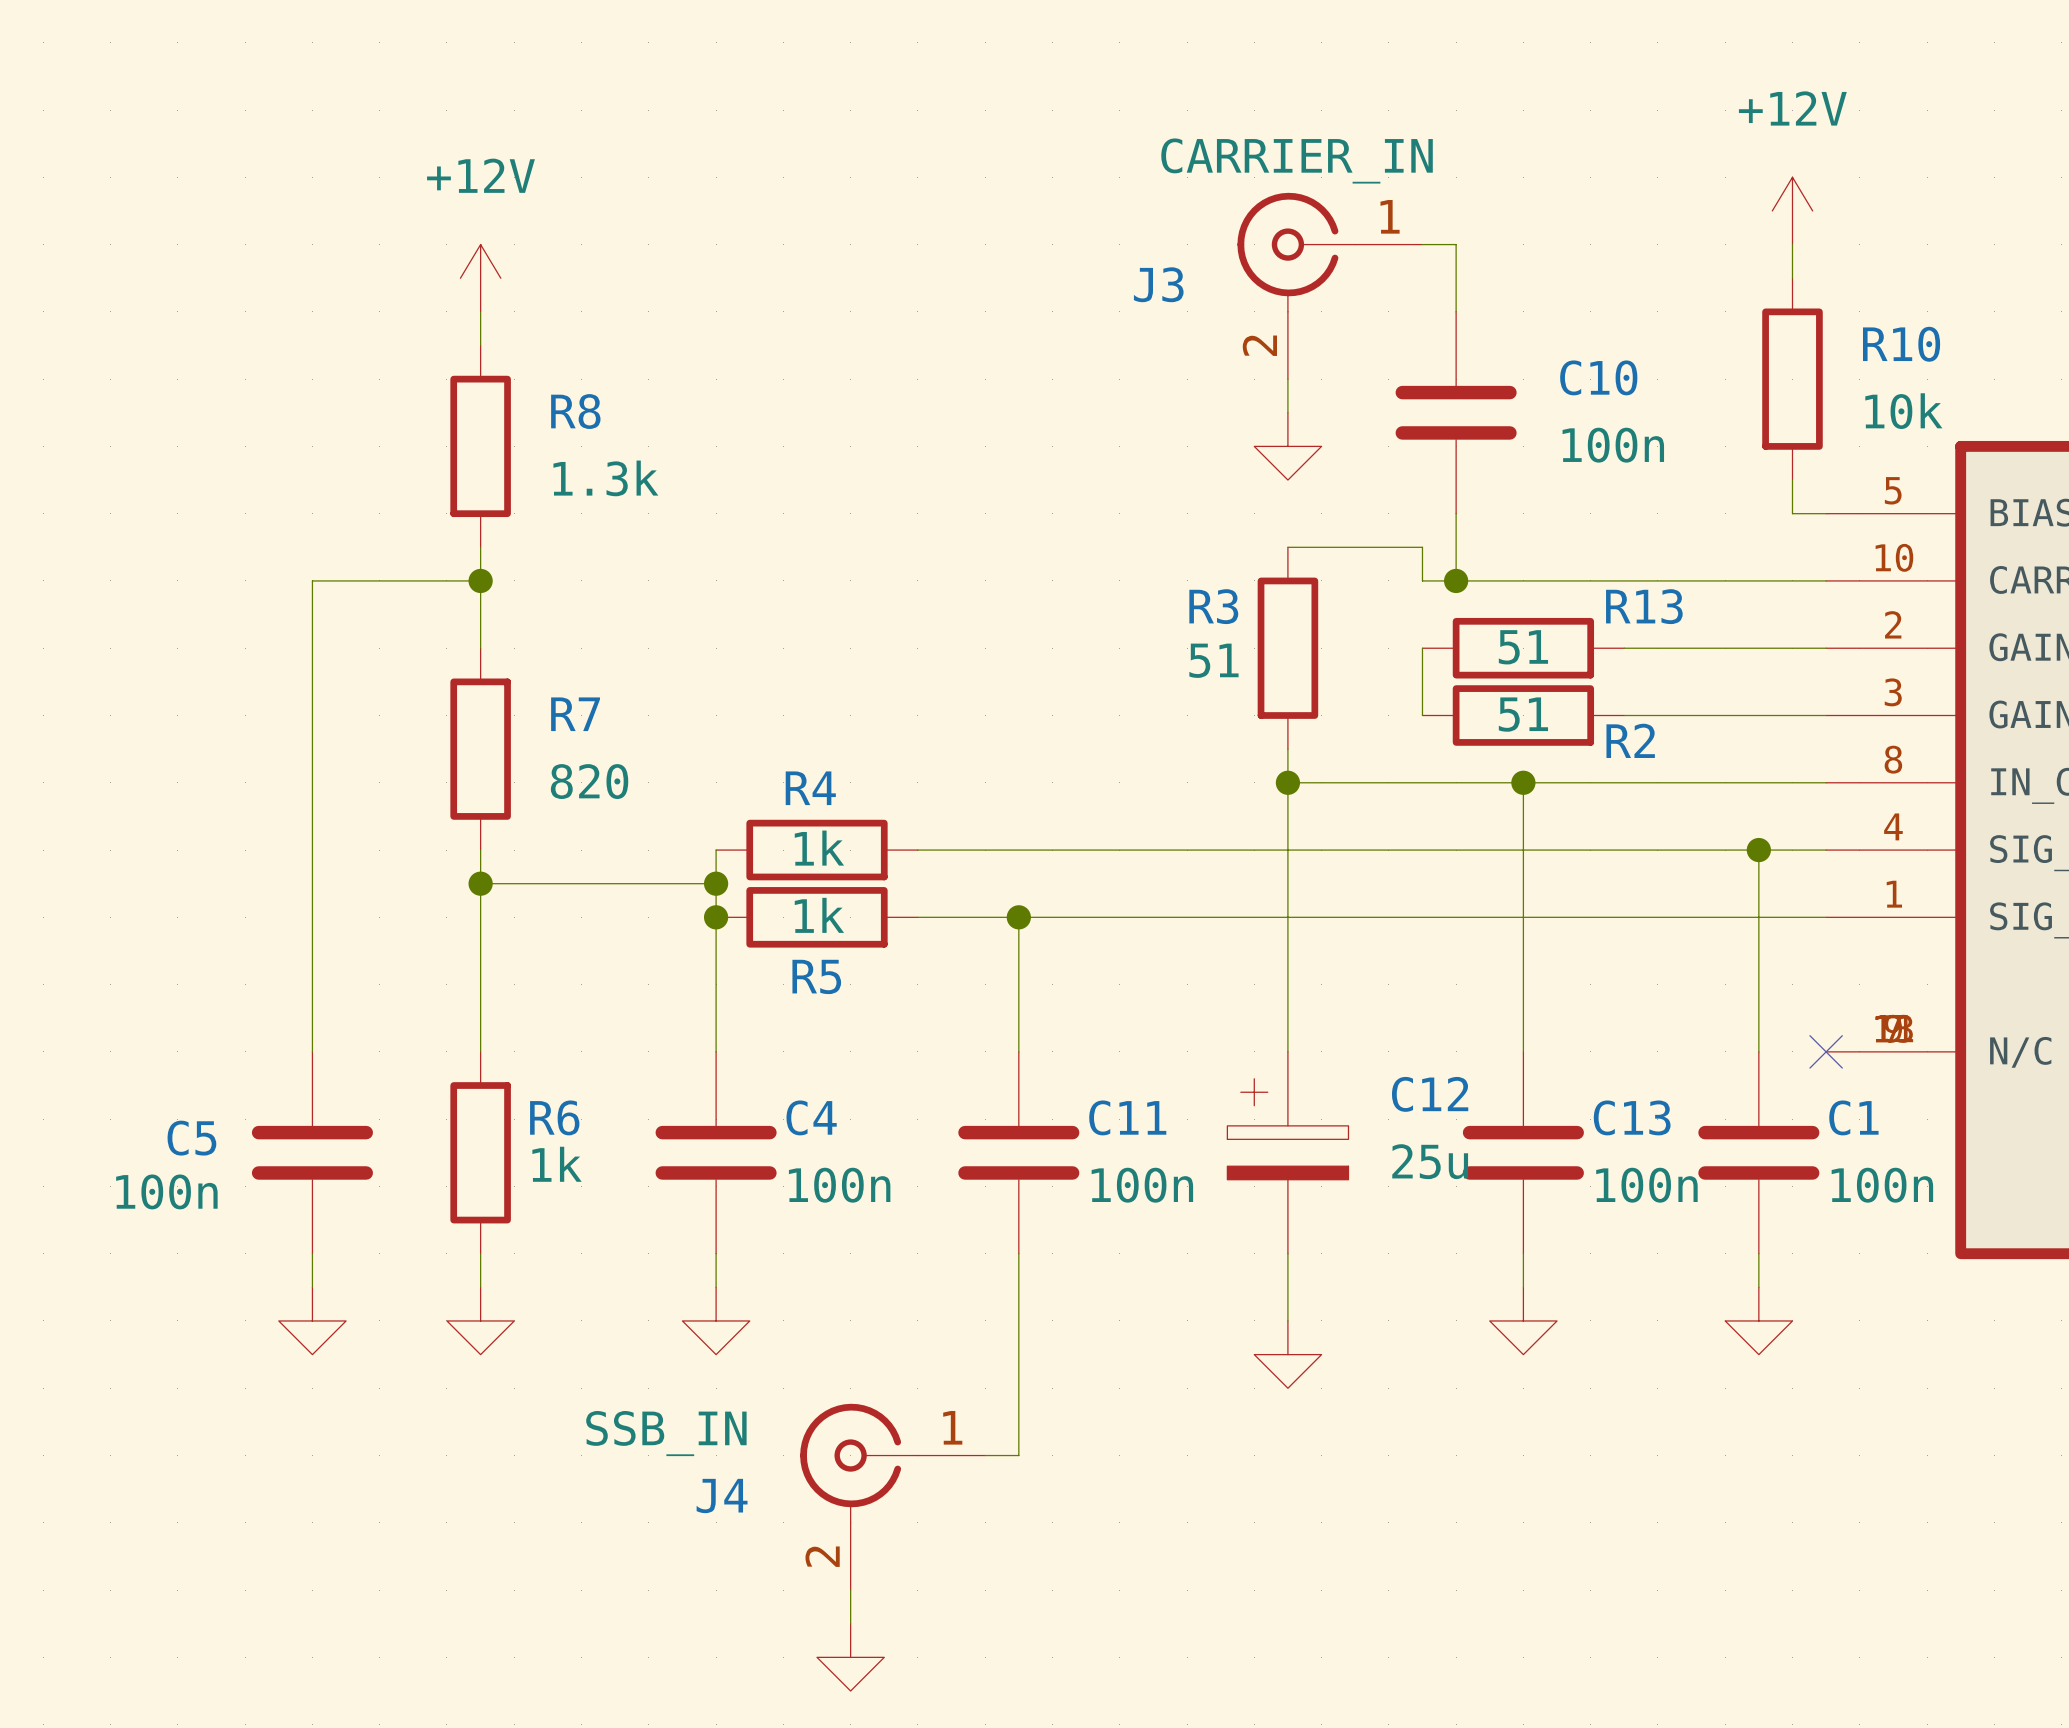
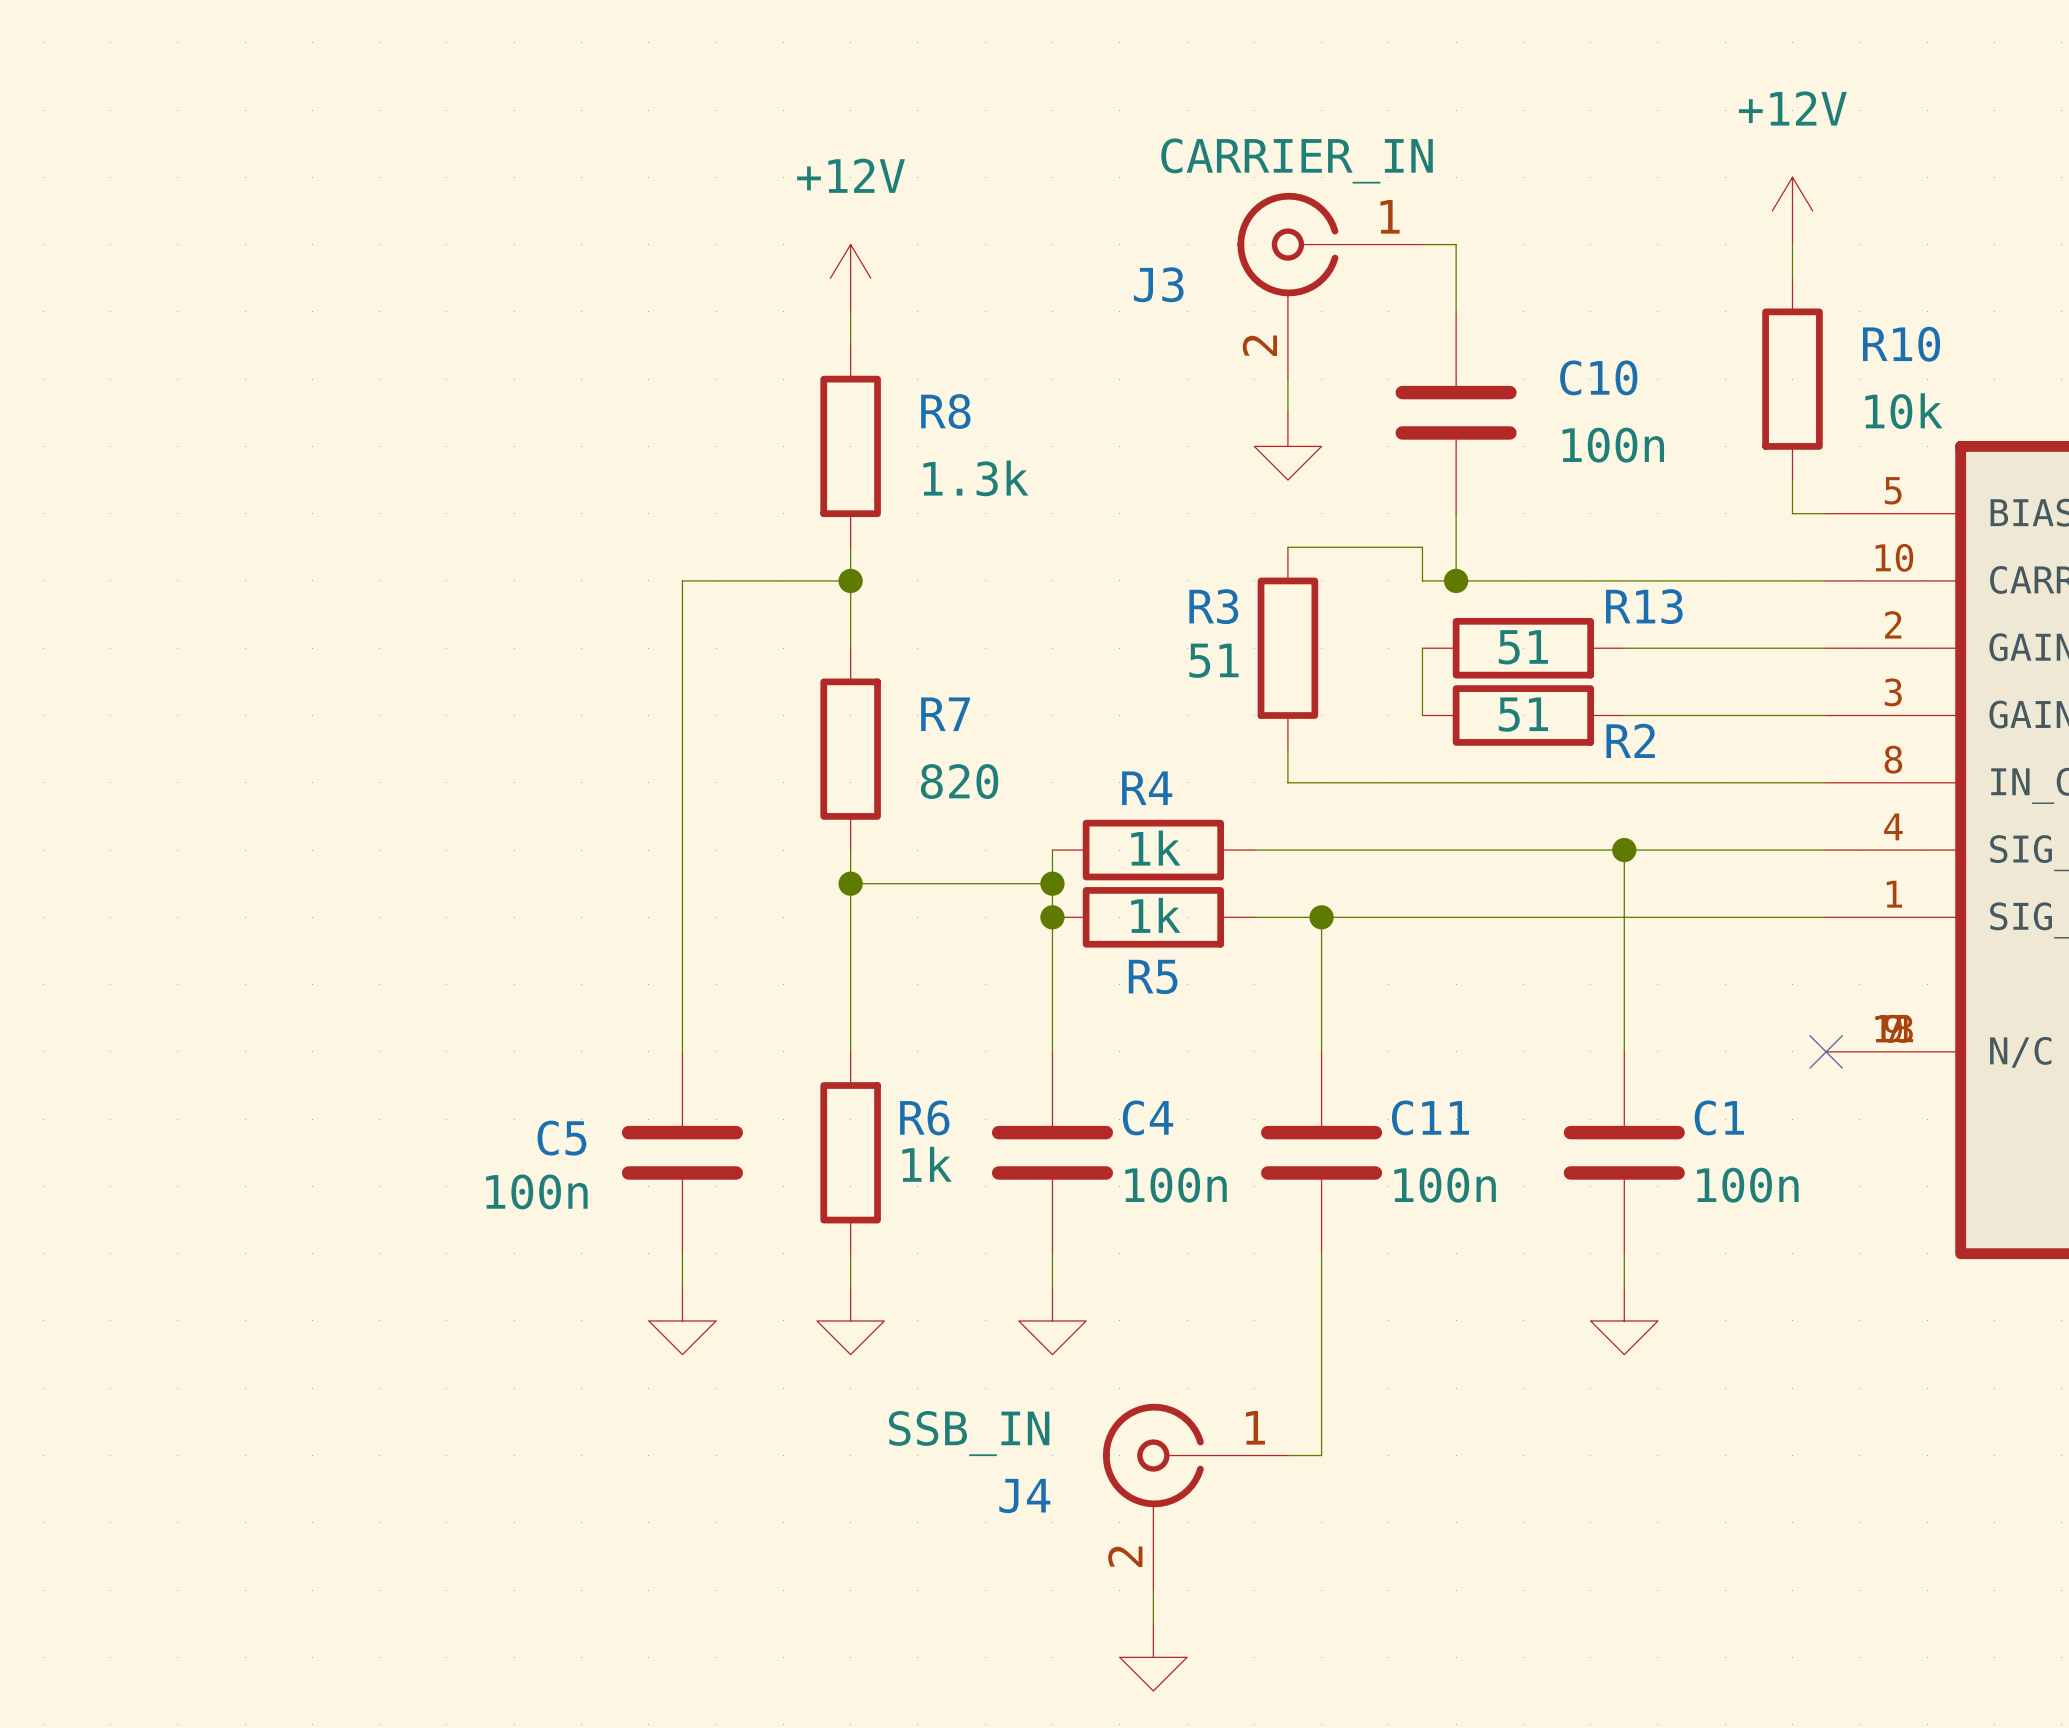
power symbol position: +12V (480, 278) -> +12V (850, 278)
wire: (480, 311) (480, 345) -> (850, 311) (850, 345)
R8 position: (480, 446) -> (850, 446)
wire: (480, 547) (480, 648) -> (850, 547) (850, 648)
wire: (480, 580) (312, 580) (312, 1051) -> (850, 580) (682, 580) (682, 1051)
junction: (480, 580) -> none
junction: none -> (850, 580)
R7 position: (480, 749) -> (850, 749)
wire: (1287, 782) (1287, 1051) -> none
junction: (1287, 782) -> none
wire: (1523, 782) (1523, 1051) -> none
junction: (1523, 782) -> none
wire: (480, 850) (480, 1051) -> (850, 850) (850, 1051)
wire: (716, 850) (716, 1051) -> (1052, 850) (1052, 1051)
R4 position: (817, 850) -> (1153, 850)
wire: (917, 850) (1254, 850) -> none
junction: none -> (1624, 850)
wire: (1758, 850) (1758, 1051) -> (1624, 850) (1624, 1051)
junction: (1758, 850) -> none
wire: (480, 883) (716, 883) -> none
junction: (480, 883) -> none
junction: (716, 883) -> none
wire: none -> (850, 883) (1052, 883)
junction: none -> (850, 883)
junction: none -> (1052, 883)
junction: (716, 917) -> none
R5 position: (817, 917) -> (1153, 917)
wire: (917, 917) (1254, 917) -> none
wire: (1018, 917) (1018, 1051) -> (1321, 917) (1321, 1051)
junction: (1018, 917) -> none
junction: none -> (1052, 917)
junction: none -> (1321, 917)
C5 position: (312, 1152) -> (682, 1152)
R6 position: (480, 1152) -> (850, 1152)
C4 position: (716, 1152) -> (1052, 1152)
C11 position: (1018, 1152) -> (1321, 1152)
C12: 25u (1287, 1152) -> none
C13: 100n (1523, 1152) -> none
C1 position: (1758, 1152) -> (1624, 1152)
wire: (312, 1253) (312, 1287) -> (682, 1253) (682, 1287)
wire: (480, 1253) (480, 1287) -> (850, 1253) (850, 1287)
wire: (716, 1253) (716, 1287) -> (1052, 1253) (1052, 1287)
wire: (1018, 1253) (1018, 1455) (985, 1455) -> (1321, 1253) (1321, 1455) (1287, 1455)
wire: (1287, 1253) (1287, 1320) -> none
wire: (1523, 1253) (1523, 1287) -> none
wire: (1758, 1253) (1758, 1287) -> (1624, 1253) (1624, 1287)
power symbol: (312, 1320) -> none
power symbol: (480, 1320) -> none
power symbol position: (716, 1320) -> (682, 1320)
power symbol: none -> (850, 1320)
power symbol: none -> (1052, 1320)
power symbol: (1523, 1320) -> none
power symbol: none -> (1624, 1320)
power symbol: (1758, 1320) -> none
power symbol: (1287, 1354) -> none
J4 position: (892, 1496) -> (1195, 1496)
wire: (850, 1590) (850, 1623) -> (1153, 1590) (1153, 1623)
power symbol: (850, 1657) -> none
power symbol: none -> (1153, 1657)

